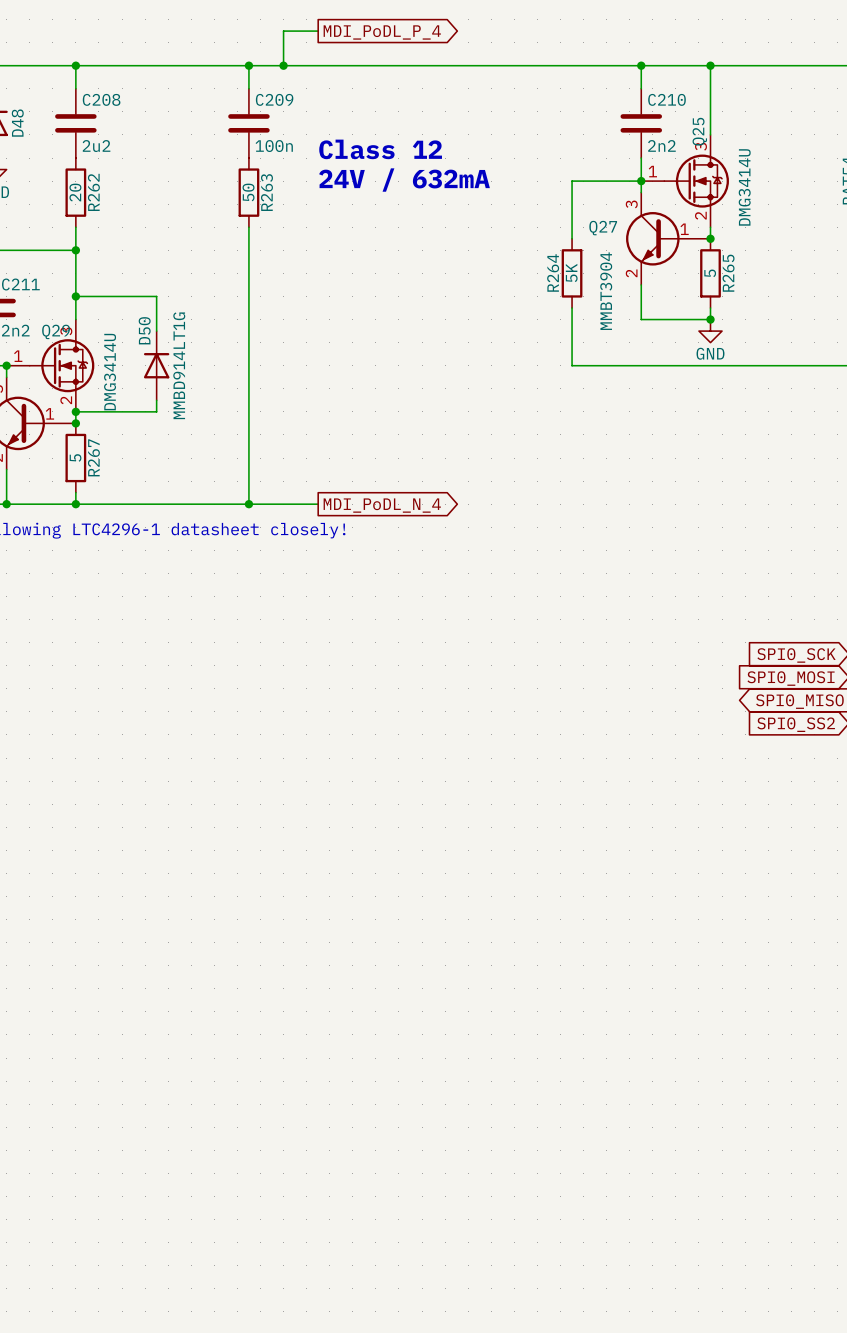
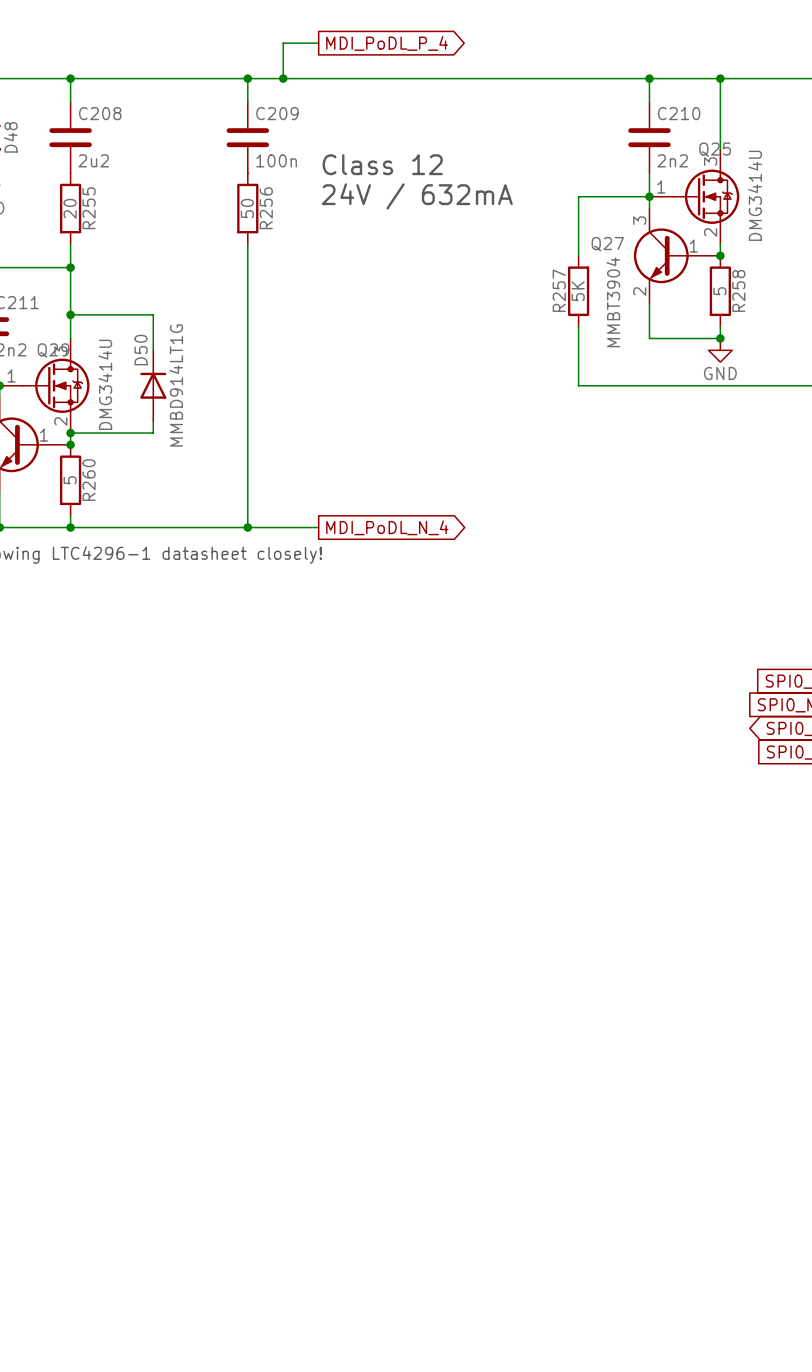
Q25 name rotation: 0° (699, 131) -> 90° clockwise (715, 149)
R262 name: R262 (93, 192) -> R255 (89, 208)
R263 name: R263 (266, 192) -> R256 (266, 208)
R264 name: R264 (553, 272) -> R257 (559, 290)
R265 name: R265 (728, 273) -> R258 (738, 290)
R267 name: R267 (93, 457) -> R260 (89, 479)

